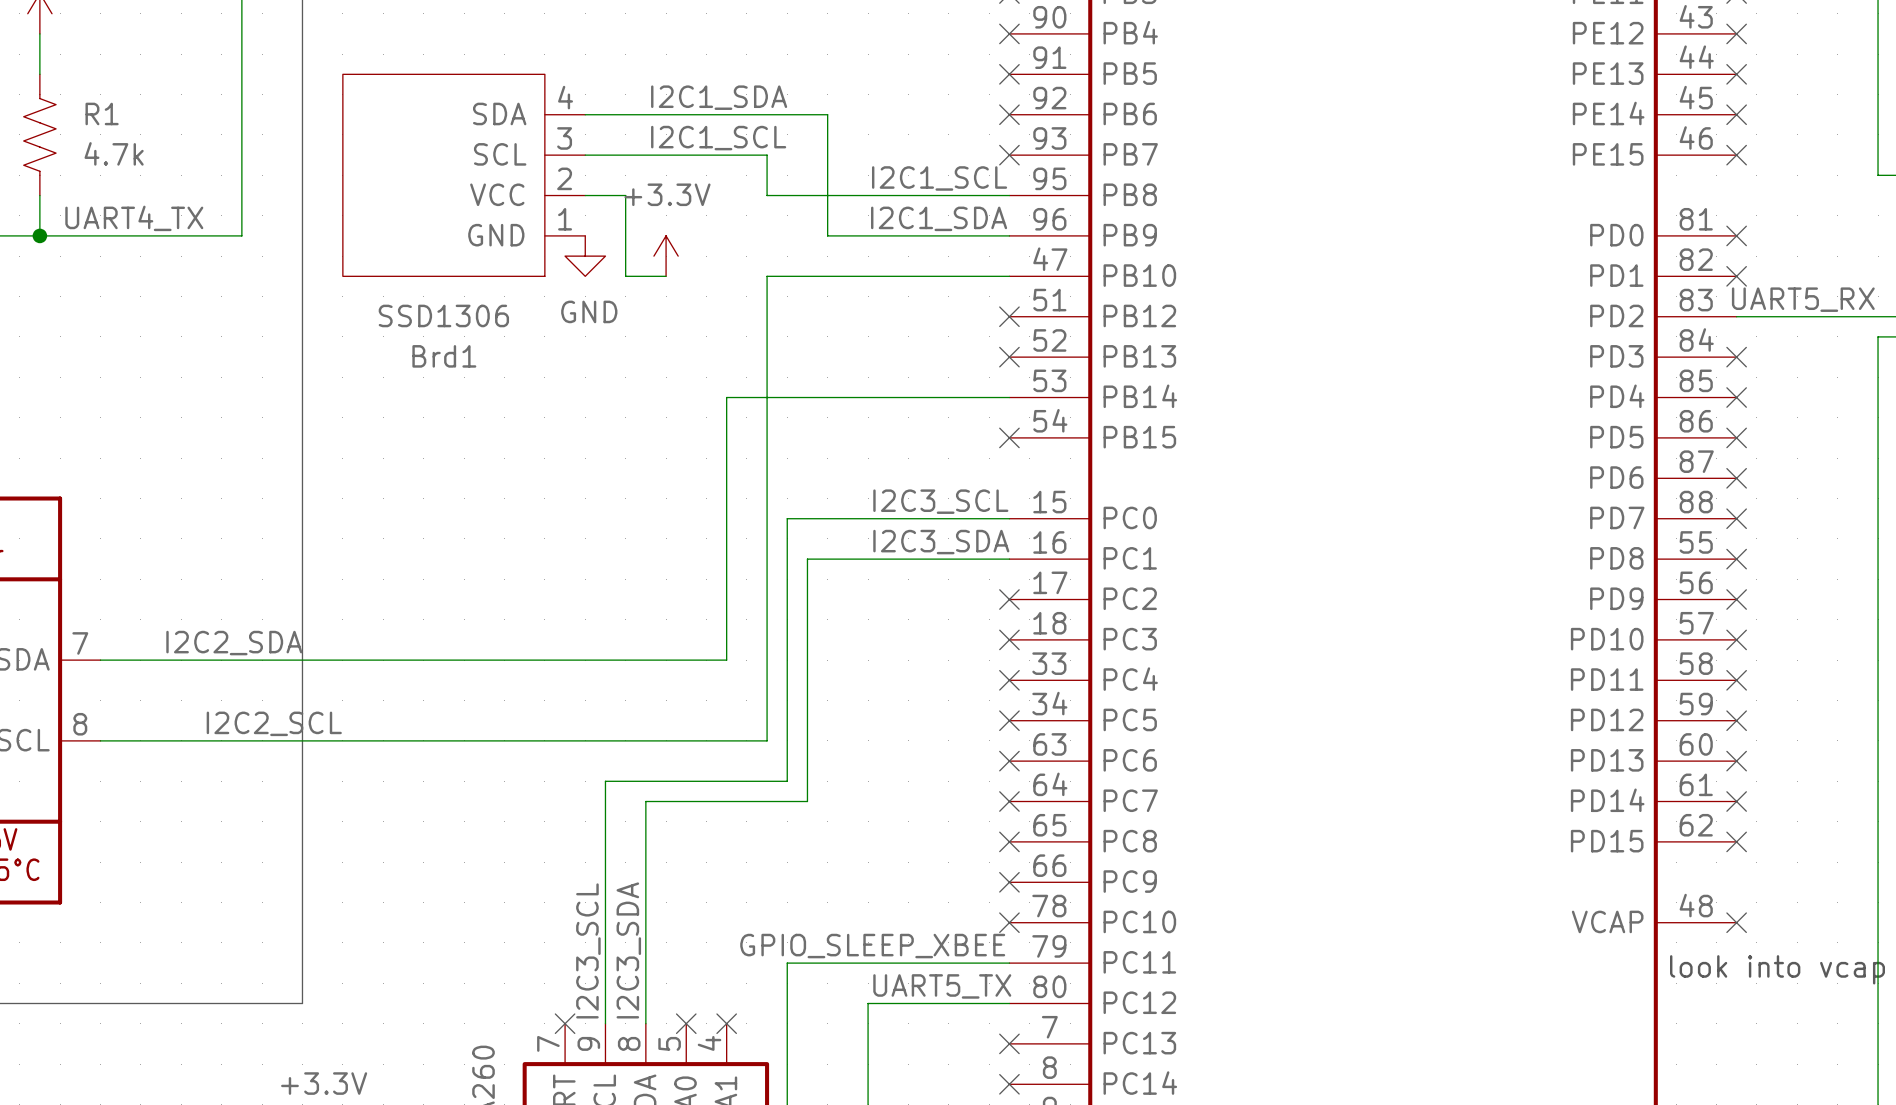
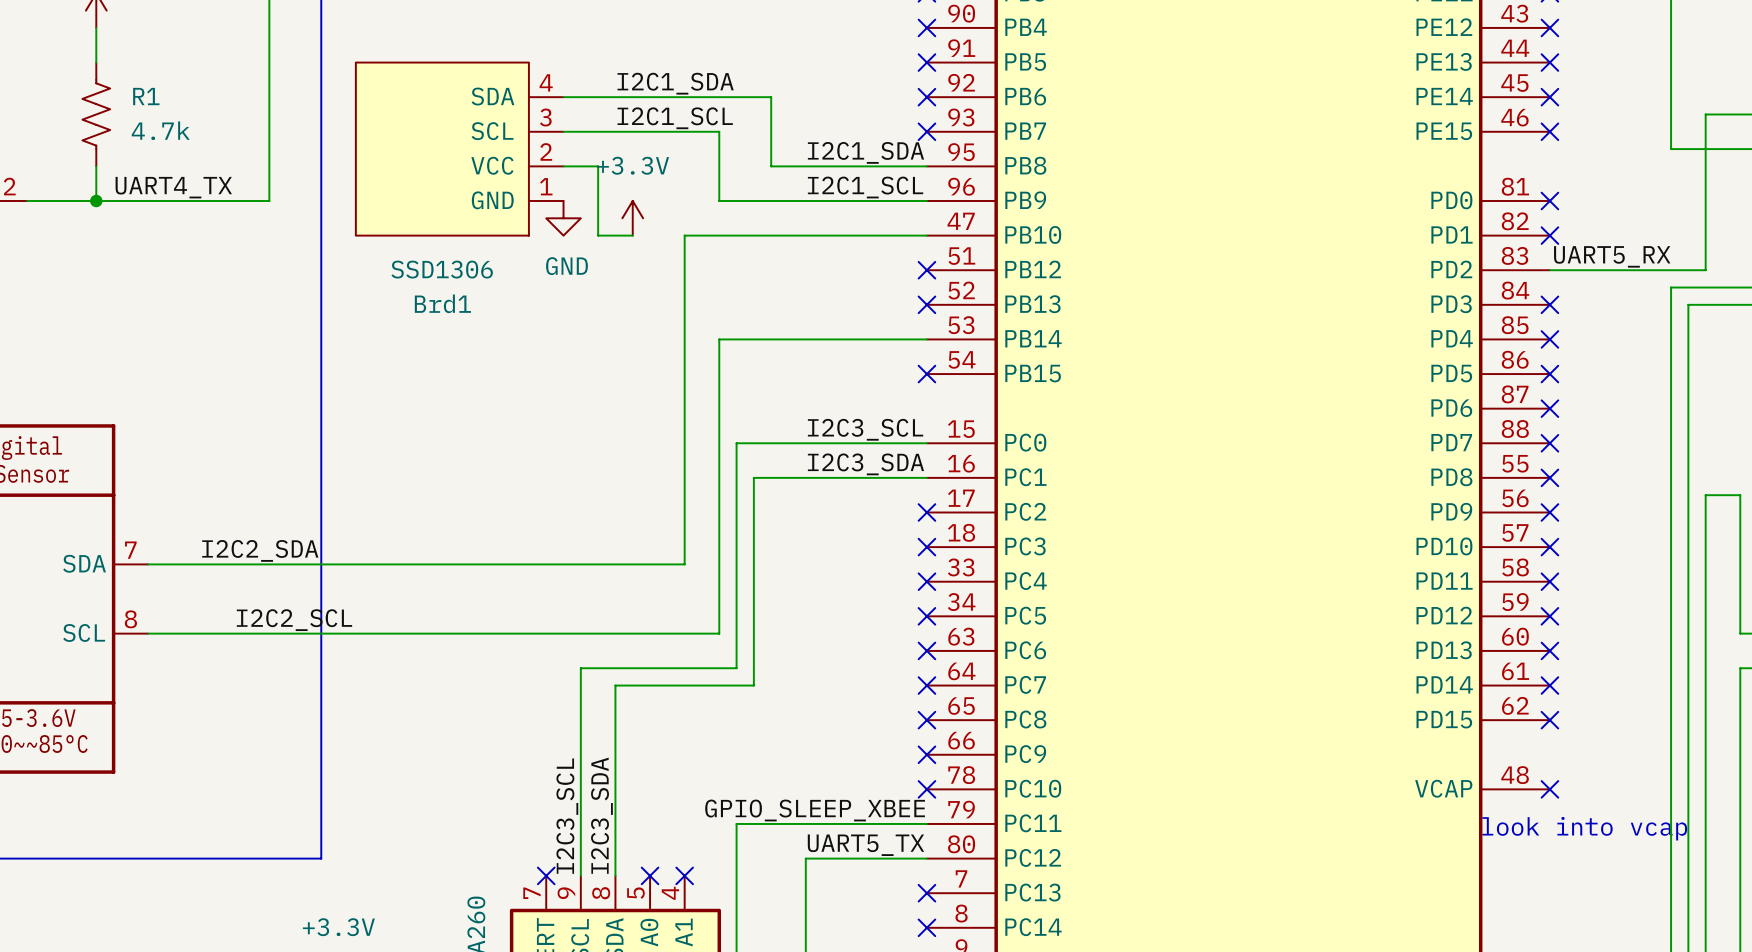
label position: I2C1_SCL (939, 178) -> I2C1_SCL (865, 187)
wire: (767, 195) (827, 195) (827, 235) -> (719, 166) (719, 201) (771, 201)
label position: I2C1_SDA (939, 218) -> I2C1_SDA (865, 152)
wire: (767, 276) (767, 397) (726, 397) -> (719, 235) (684, 235) (684, 339)

